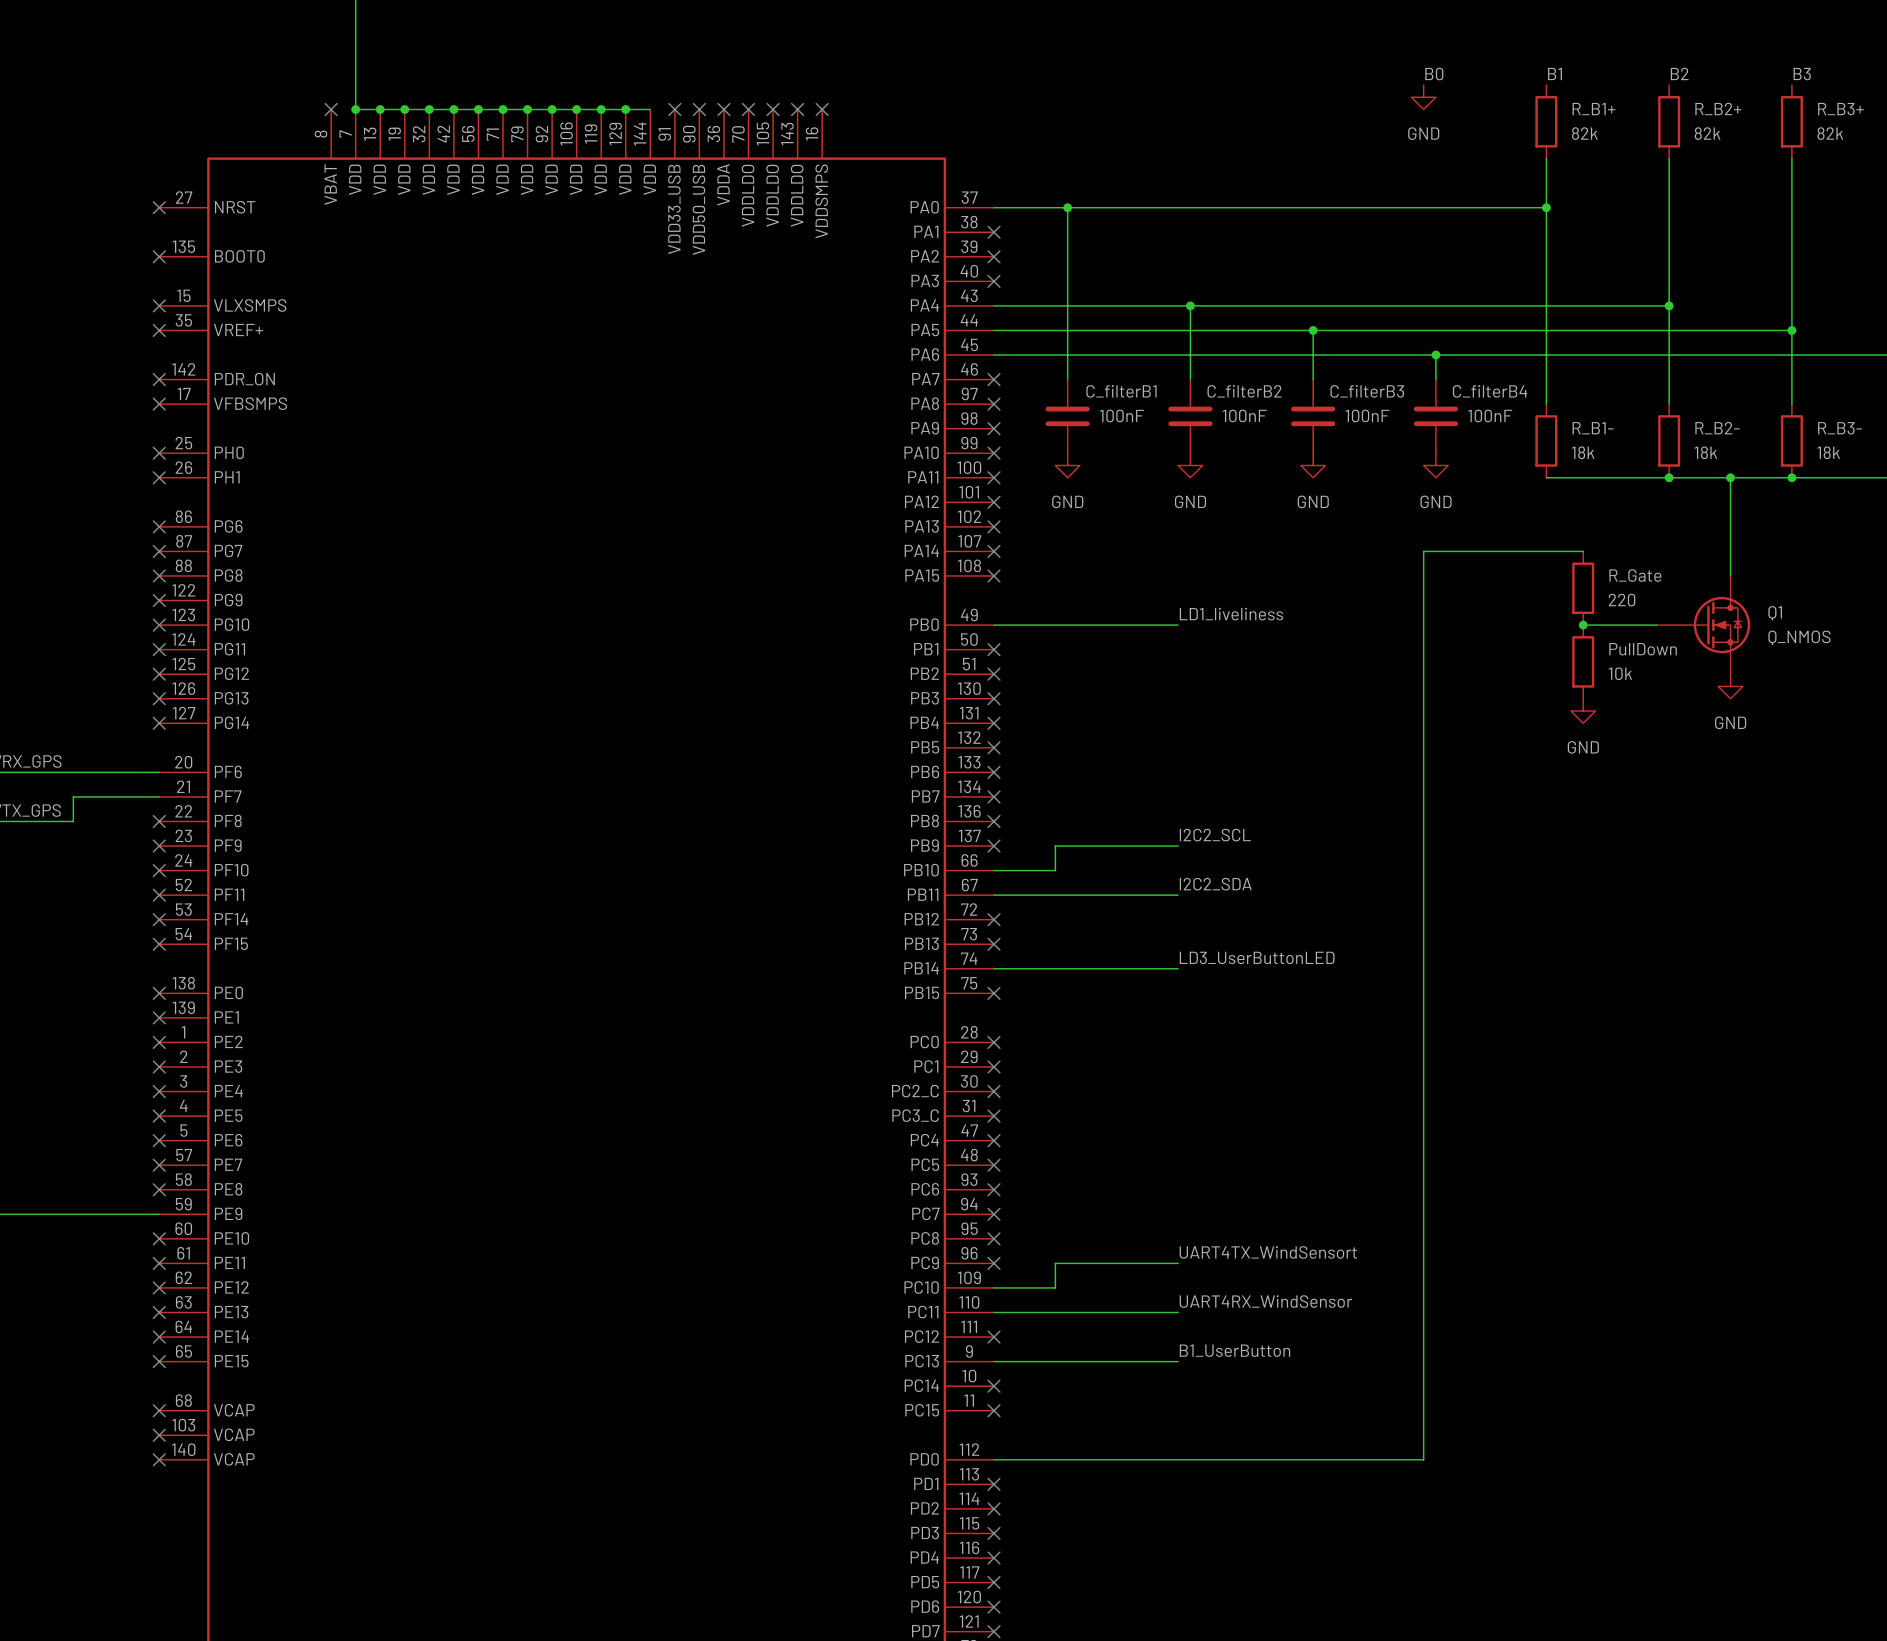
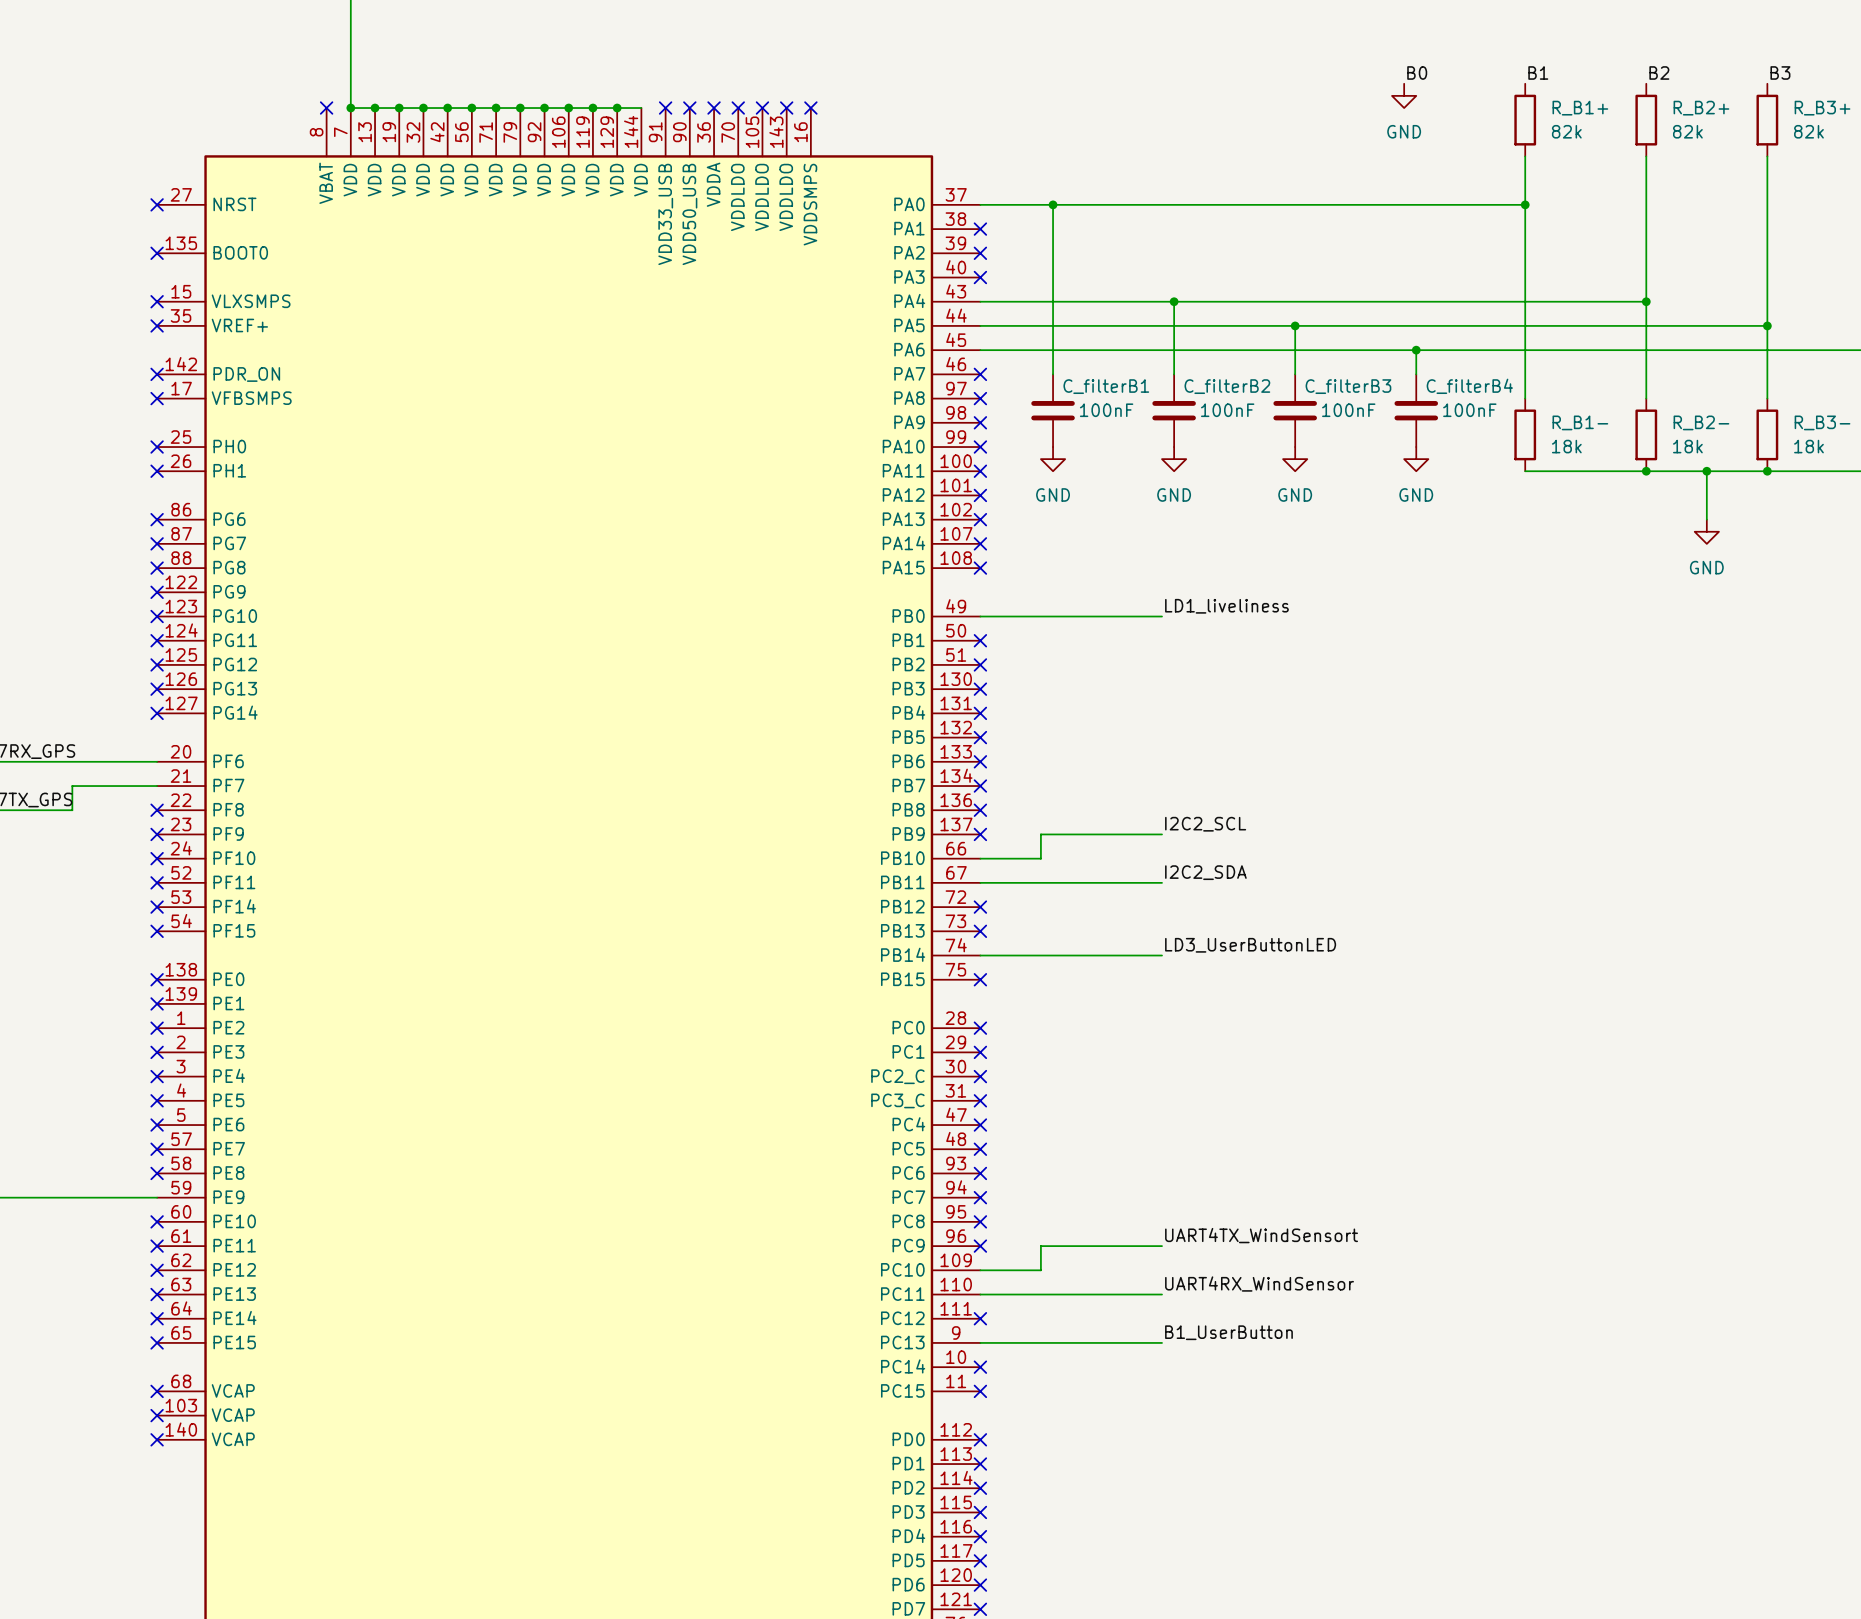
wire: (1730, 526) (1730, 575) -> none
power symbol: none -> GND (1706, 531)
wire: (1583, 551) (1423, 551) (1423, 1459) (994, 1459) -> none
R_Gate: 220 (1583, 588) -> none
wire: (1583, 625) (1656, 625) -> none
junction: (1583, 625) -> none
Q1: Q_NMOS (1703, 625) -> none
PullDown: 10k (1583, 661) -> none
power symbol: GND (1730, 686) -> none
power symbol: GND (1583, 711) -> none
no-connect mark: none -> (980, 1439)

